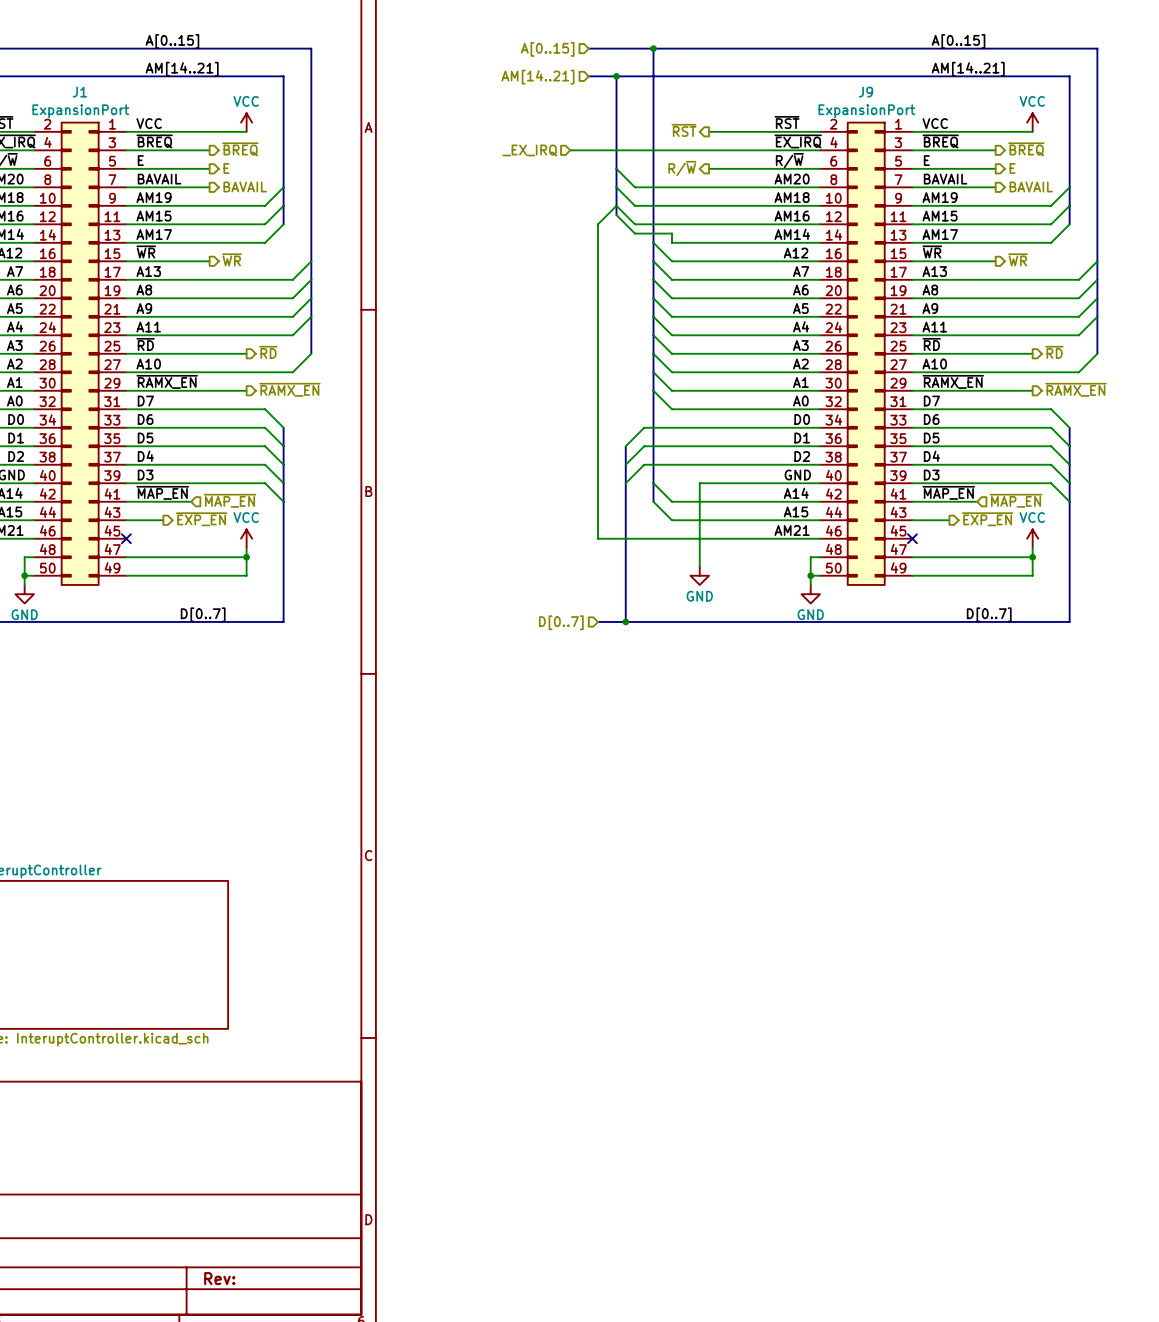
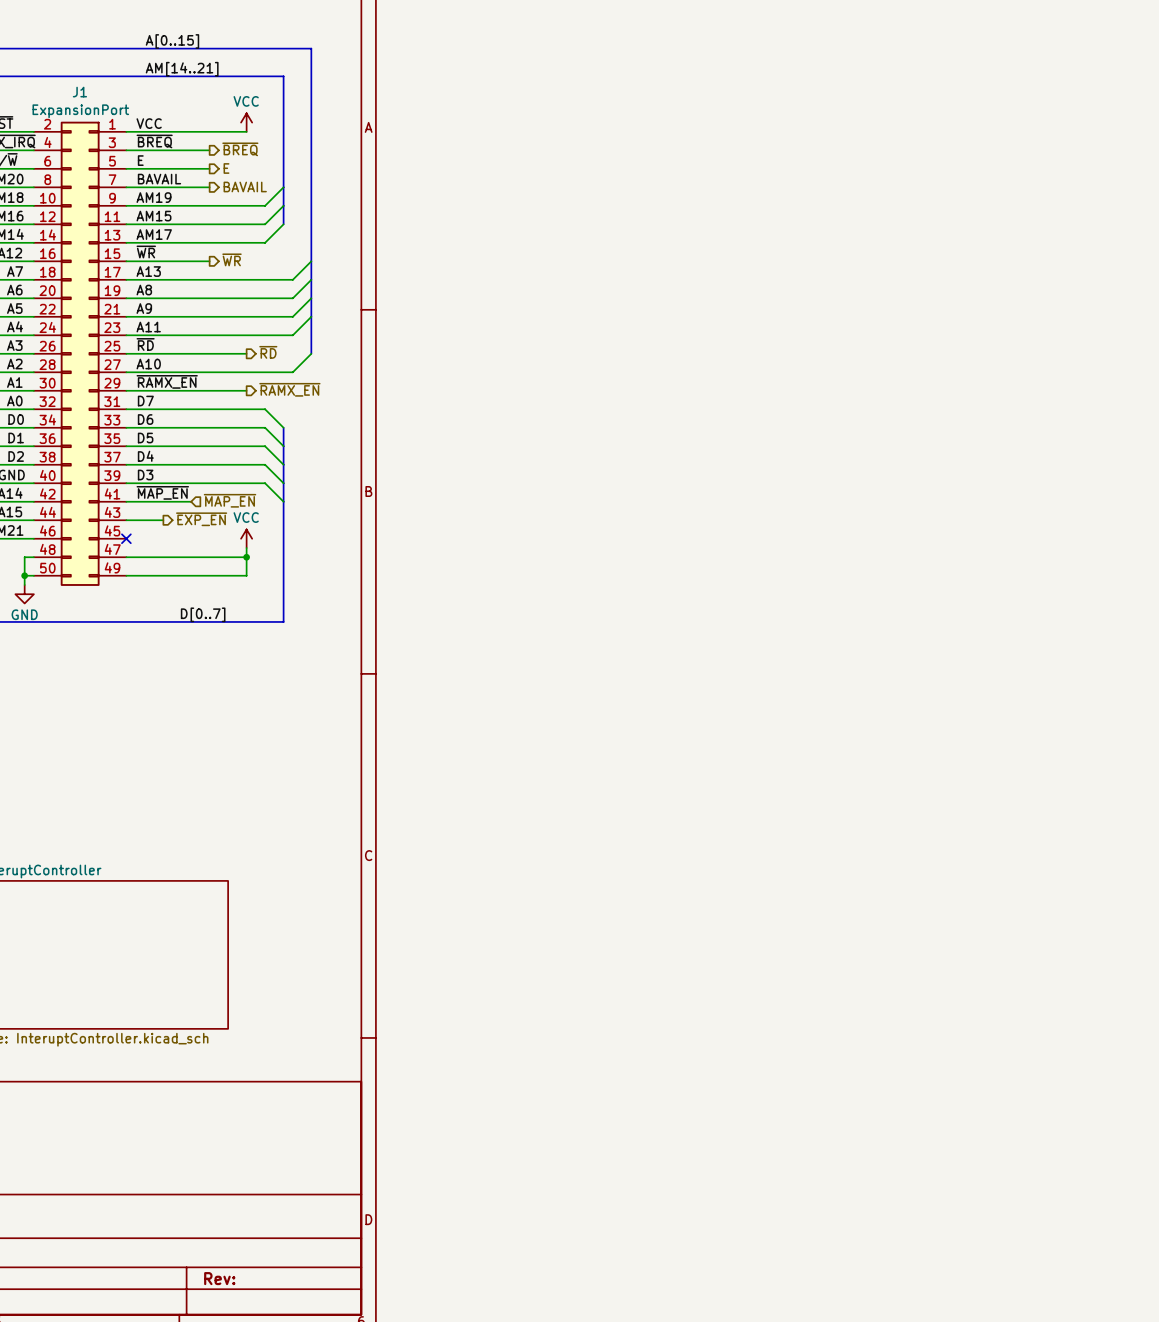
label: A[0..15] (958, 41) -> none
bus: (588, 48) (1097, 48) (1097, 353) -> none
bus: (653, 48) (653, 501) -> none
junction: (653, 48) -> none
hierarchical label: A[0..15] (547, 49) -> none
label: AM[14..21] (968, 69) -> none
bus: (588, 76) (1069, 76) (1069, 224) -> none
bus: (616, 76) (616, 215) -> none
junction: (616, 76) -> none
hierarchical label: AM[14..21] (537, 77) -> none
label: ~{RST} (787, 122) -> none
power symbol: VCC (1032, 122) -> none
label: VCC (935, 123) -> none
hierarchical label: ~{RST} (683, 130) -> none
wire: (708, 131) (819, 131) -> none
wire: (912, 131) (1032, 131) -> none
label: ~{EX_IRQ} (798, 141) -> none
label: ~{BREQ} (940, 141) -> none
hierarchical label: ~{BREQ} (1026, 149) -> none
hierarchical label: _EX_IRQ (529, 150) -> none
wire: (570, 150) (819, 150) -> none
wire: (912, 150) (995, 150) -> none
label: R/~{W} (789, 160) -> none
label: E (926, 160) -> none
wire: (616, 168) (635, 187) (819, 187) -> none
hierarchical label: R/~{W} (682, 168) -> none
wire: (708, 168) (819, 168) -> none
wire: (912, 168) (995, 168) -> none
hierarchical label: E (1012, 168) -> none
label: AM20 (792, 179) -> none
label: BAVAIL (945, 179) -> none
hierarchical label: BAVAIL (1031, 186) -> none
wire: (616, 187) (635, 205) (819, 205) -> none
wire: (912, 187) (995, 187) -> none
wire: (1069, 187) (1051, 205) (912, 205) -> none
label: AM18 (792, 197) -> none
label: AM19 (940, 197) -> none
wire: (1069, 205) (1051, 224) (912, 224) -> none
wire: (616, 215) (635, 233) (672, 233) (672, 242) (819, 242) -> none
label: AM16 (792, 216) -> none
label: AM15 (940, 216) -> none
wire: (819, 224) (635, 224) (616, 205) (598, 224) (598, 538) (819, 538) -> none
wire: (1069, 224) (1051, 242) (912, 242) -> none
label: AM14 (792, 234) -> none
label: AM17 (940, 234) -> none
wire: (653, 242) (672, 261) (819, 261) -> none
label: ~{WR} (932, 252) -> none
label: A12 (796, 253) -> none
hierarchical label: ~{WR} (1018, 259) -> none
wire: (653, 261) (672, 279) (819, 279) -> none
wire: (912, 261) (995, 261) -> none
wire: (1097, 261) (1078, 279) (912, 279) -> none
label: A7 (801, 271) -> none
label: A13 (934, 271) -> none
wire: (653, 279) (672, 298) (819, 298) -> none
wire: (1097, 279) (1078, 298) (912, 298) -> none
label: A6 (800, 290) -> none
label: A8 (930, 290) -> none
wire: (653, 298) (672, 316) (819, 316) -> none
wire: (1097, 298) (1078, 316) (912, 316) -> none
label: A5 (800, 308) -> none
label: A9 (930, 308) -> none
wire: (653, 316) (672, 335) (819, 335) -> none
wire: (1097, 316) (1078, 335) (912, 335) -> none
label: A4 (801, 326) -> none
label: A11 (934, 327) -> none
wire: (653, 335) (672, 353) (819, 353) -> none
label: ~{RD} (931, 344) -> none
label: A3 (800, 345) -> none
hierarchical label: ~{RD} (1054, 352) -> none
wire: (653, 353) (672, 372) (819, 372) -> none
J9: ExpansionPort (866, 353) -> none
wire: (912, 353) (1032, 353) -> none
wire: (1097, 353) (1078, 372) (912, 372) -> none
label: A2 (800, 364) -> none
label: A10 (934, 364) -> none
wire: (653, 372) (672, 390) (819, 390) -> none
label: ~{RAMX_EN} (953, 381) -> none
label: A1 (800, 382) -> none
hierarchical label: ~{RAMX_EN} (1075, 389) -> none
wire: (653, 390) (672, 409) (819, 409) -> none
wire: (912, 390) (1032, 390) -> none
label: A0 (800, 401) -> none
label: D7 (931, 401) -> none
wire: (912, 409) (1051, 409) (1069, 427) -> none
label: D0 (802, 419) -> none
label: D6 (931, 419) -> none
wire: (819, 427) (644, 427) (625, 446) -> none
wire: (912, 427) (1051, 427) (1069, 446) -> none
bus: (1069, 427) (1069, 621) (598, 621) -> none
label: D1 (802, 438) -> none
label: D5 (931, 438) -> none
bus: (625, 446) (625, 621) -> none
wire: (819, 446) (644, 446) (625, 464) -> none
wire: (912, 446) (1051, 446) (1069, 464) -> none
label: D2 (802, 456) -> none
label: D4 (931, 456) -> none
wire: (819, 464) (644, 464) (625, 483) -> none
wire: (912, 464) (1051, 464) (1069, 483) -> none
label: GND (797, 475) -> none
label: D3 (931, 475) -> none
wire: (653, 483) (672, 501) (819, 501) -> none
wire: (819, 483) (699, 483) (699, 566) -> none
wire: (912, 483) (1051, 483) (1069, 501) -> none
label: ~{MAP_EN} (948, 492) -> none
label: A14 (796, 493) -> none
hierarchical label: ~{MAP_EN} (1016, 500) -> none
wire: (653, 501) (672, 520) (819, 520) -> none
wire: (912, 501) (977, 501) -> none
label: A15 (796, 512) -> none
hierarchical label: ~{EXP_EN} (987, 519) -> none
wire: (912, 520) (949, 520) -> none
label: AM21 (792, 530) -> none
no-connect mark: (912, 538) -> none
power symbol: VCC (1032, 538) -> none
wire: (1032, 547) (1032, 575) (912, 575) -> none
wire: (819, 557) (810, 557) (810, 584) -> none
wire: (912, 557) (1032, 557) -> none
junction: (1032, 557) -> none
power symbol: GND (699, 575) -> none
wire: (810, 575) (819, 575) -> none
junction: (810, 575) -> none
power symbol: GND (810, 594) -> none
label: D[0..7] (989, 614) -> none
junction: (625, 621) -> none
hierarchical label: D[0..7] (561, 622) -> none

